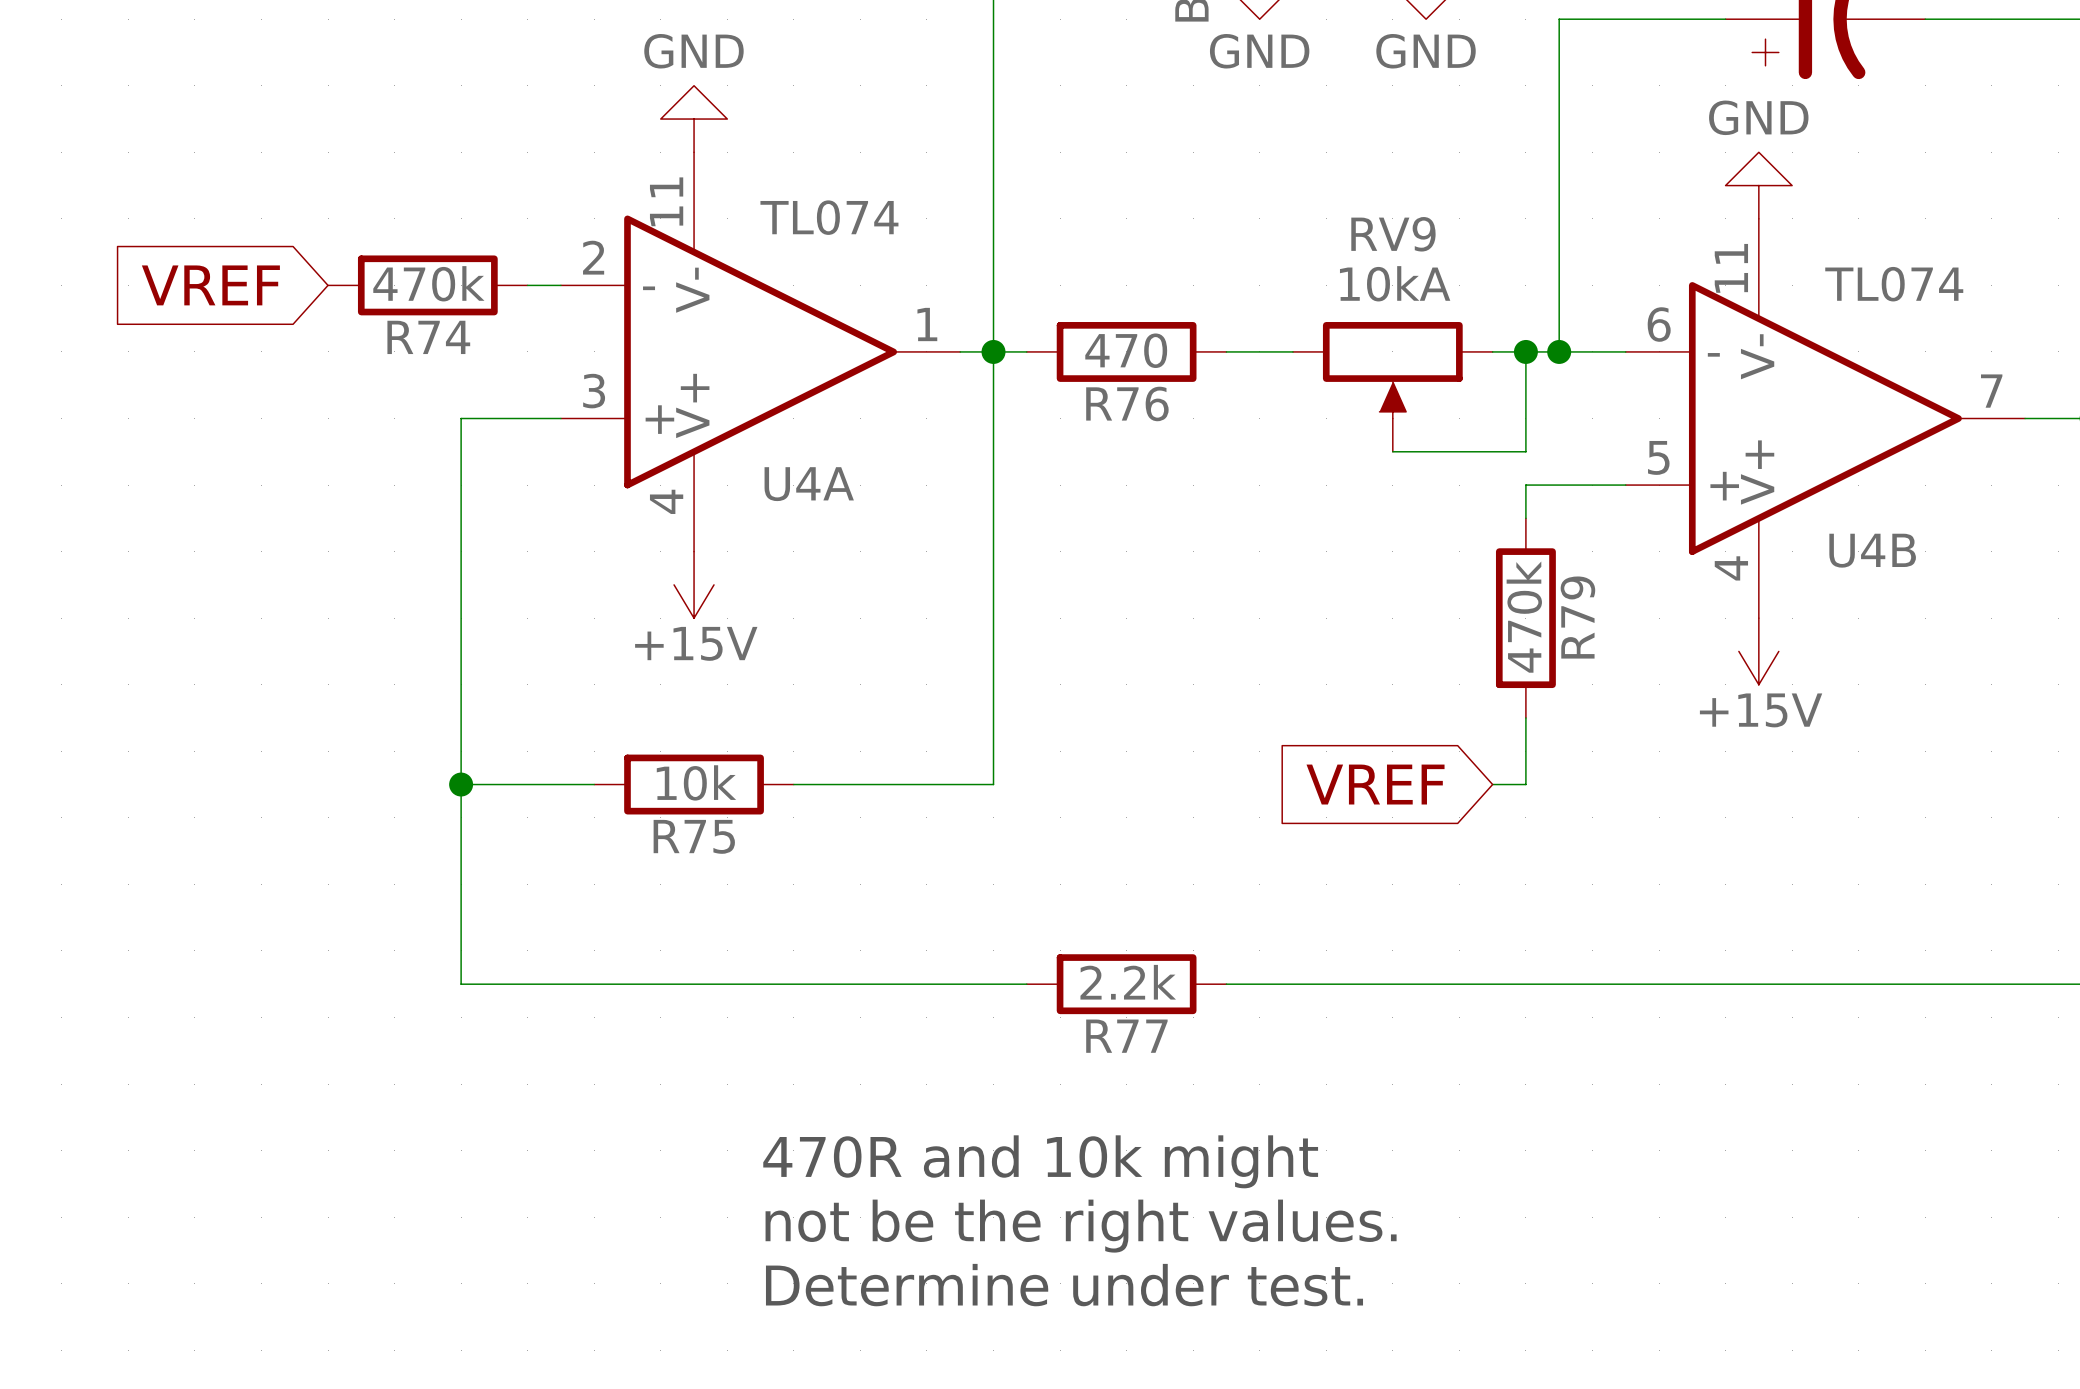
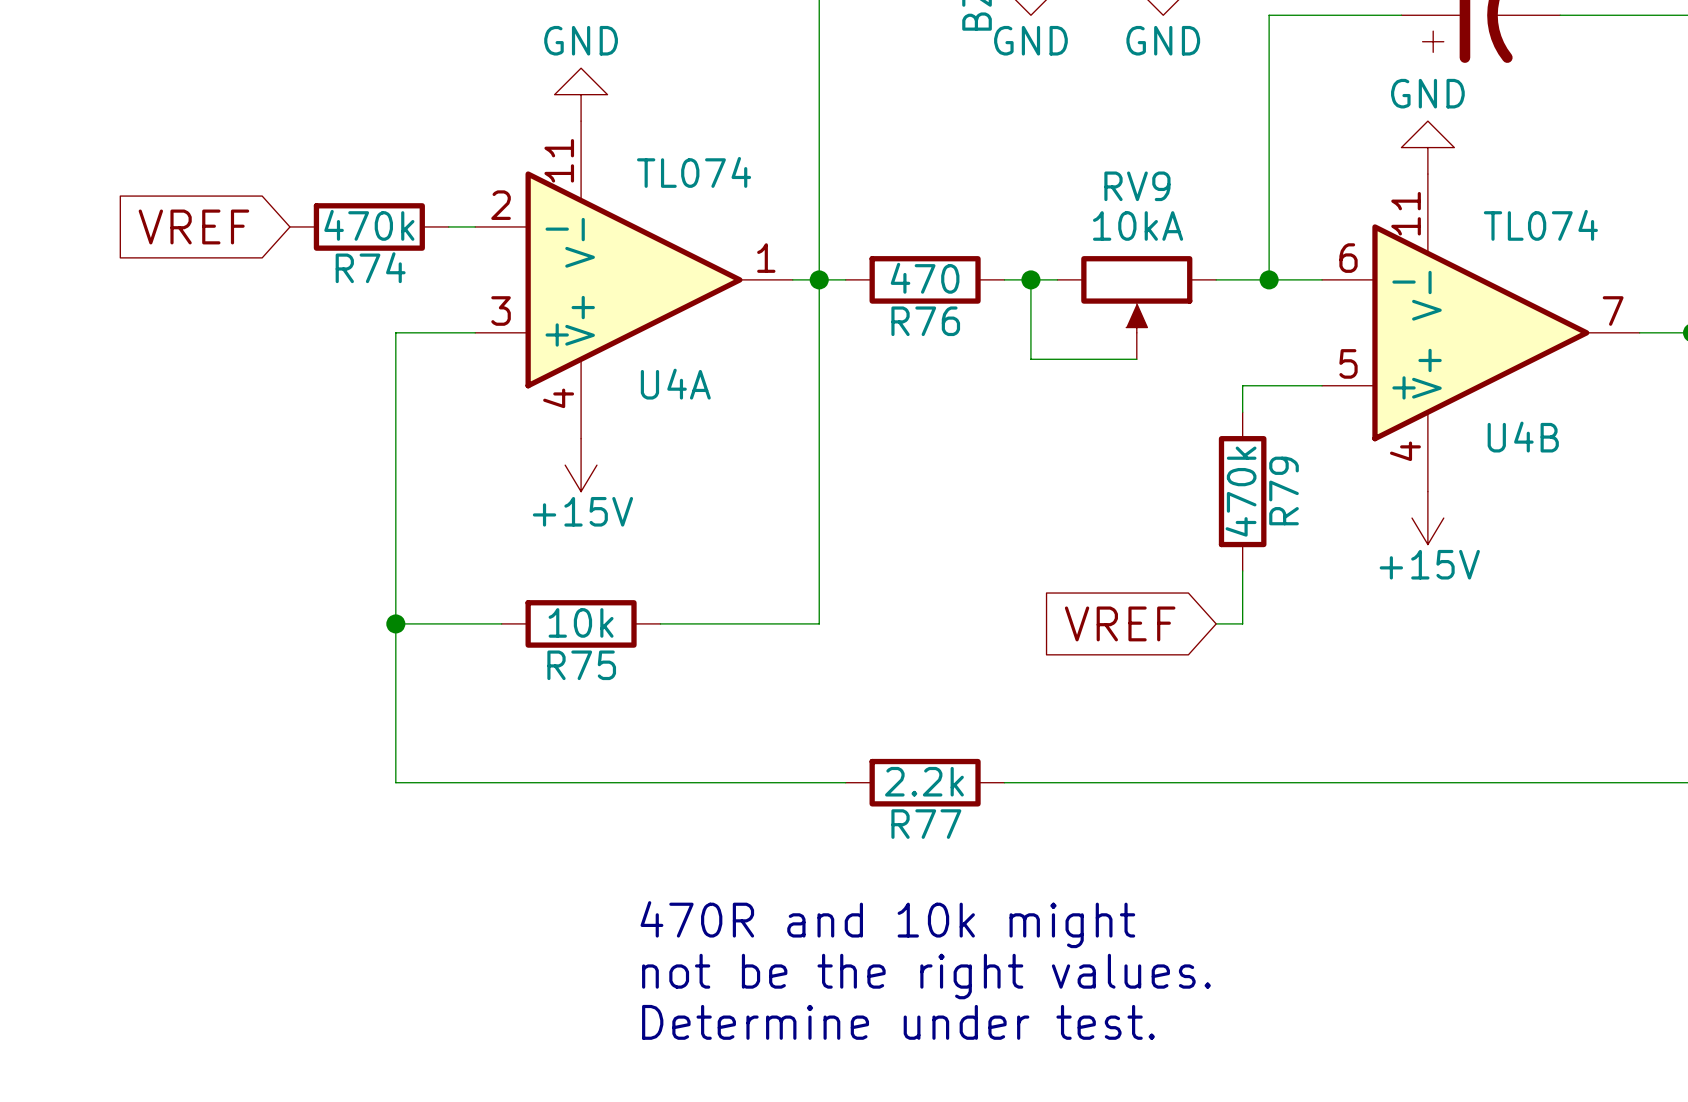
junction: none -> (1030, 279)
wire: (1525, 351) (1525, 451) (1392, 451) -> (1030, 279) (1030, 359) (1136, 359)
junction: (1525, 351) -> none

